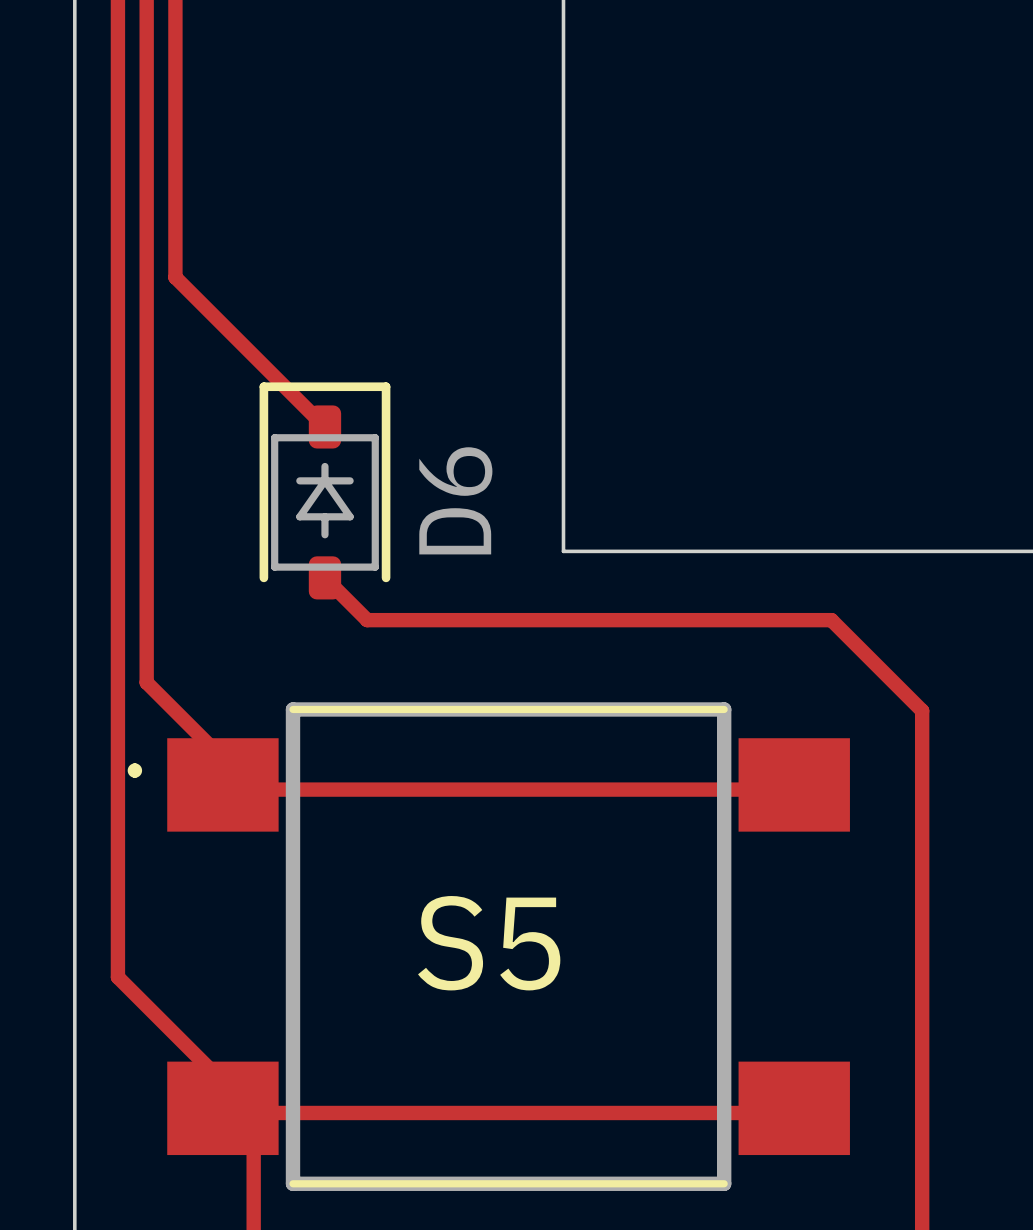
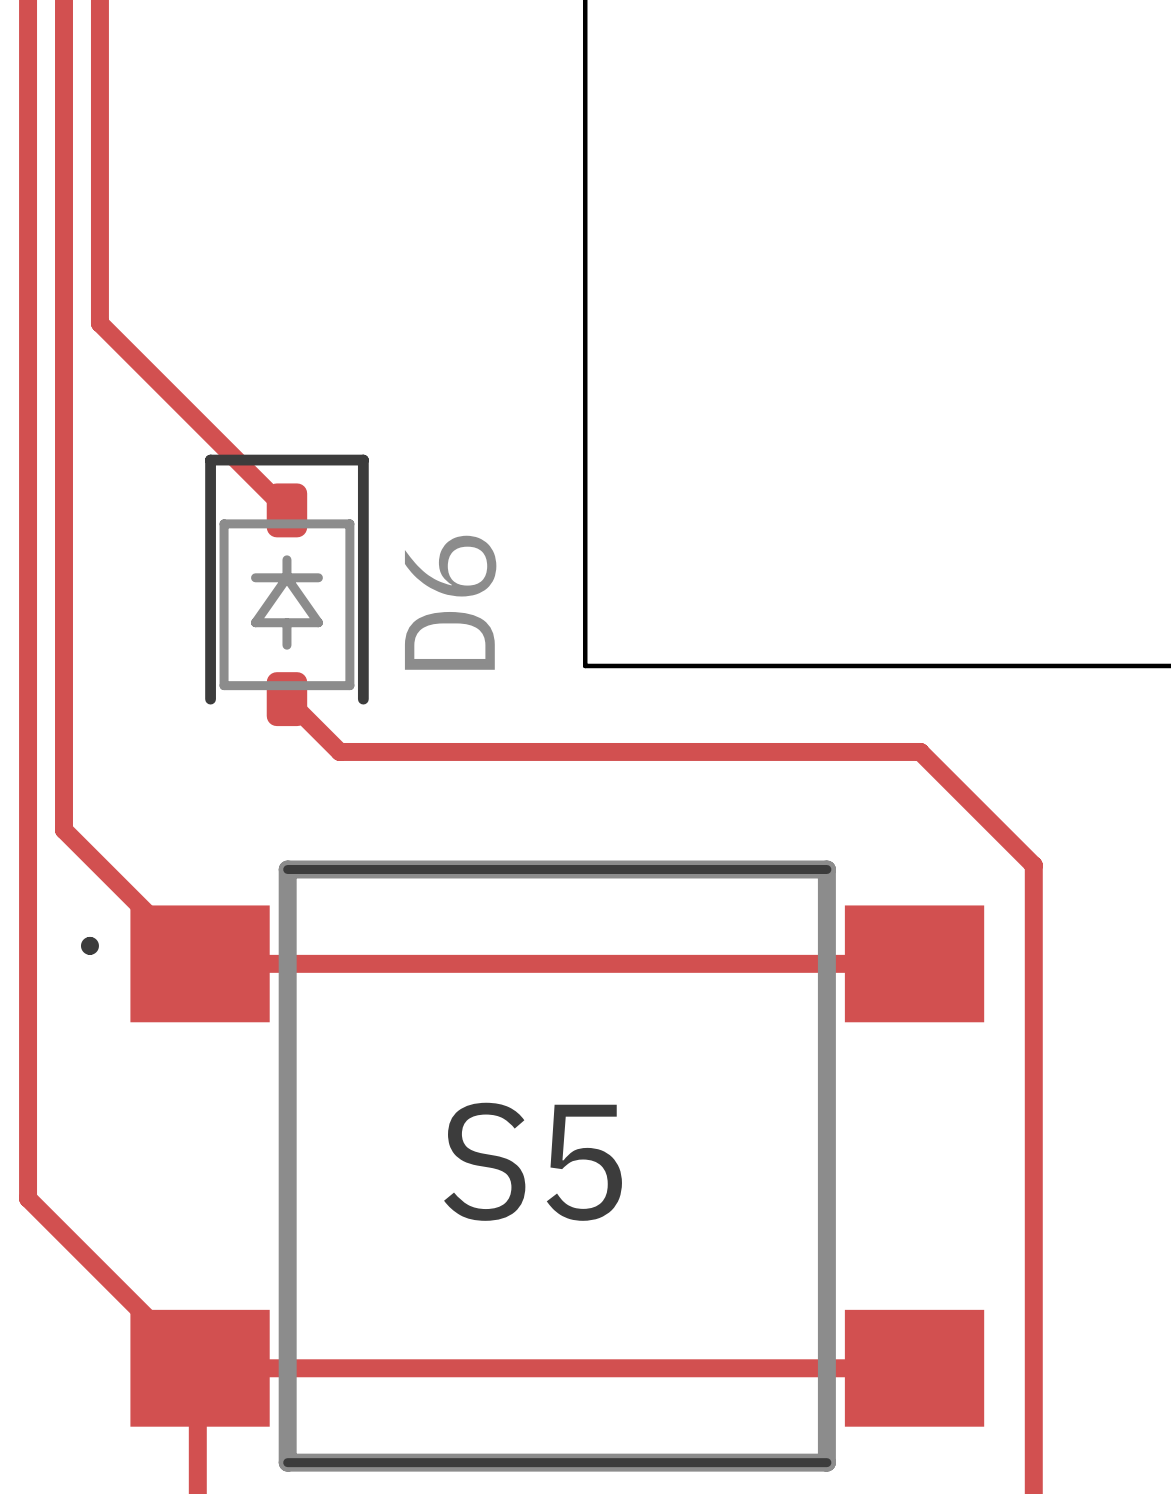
S5 position: (488, 946) -> (532, 1166)

